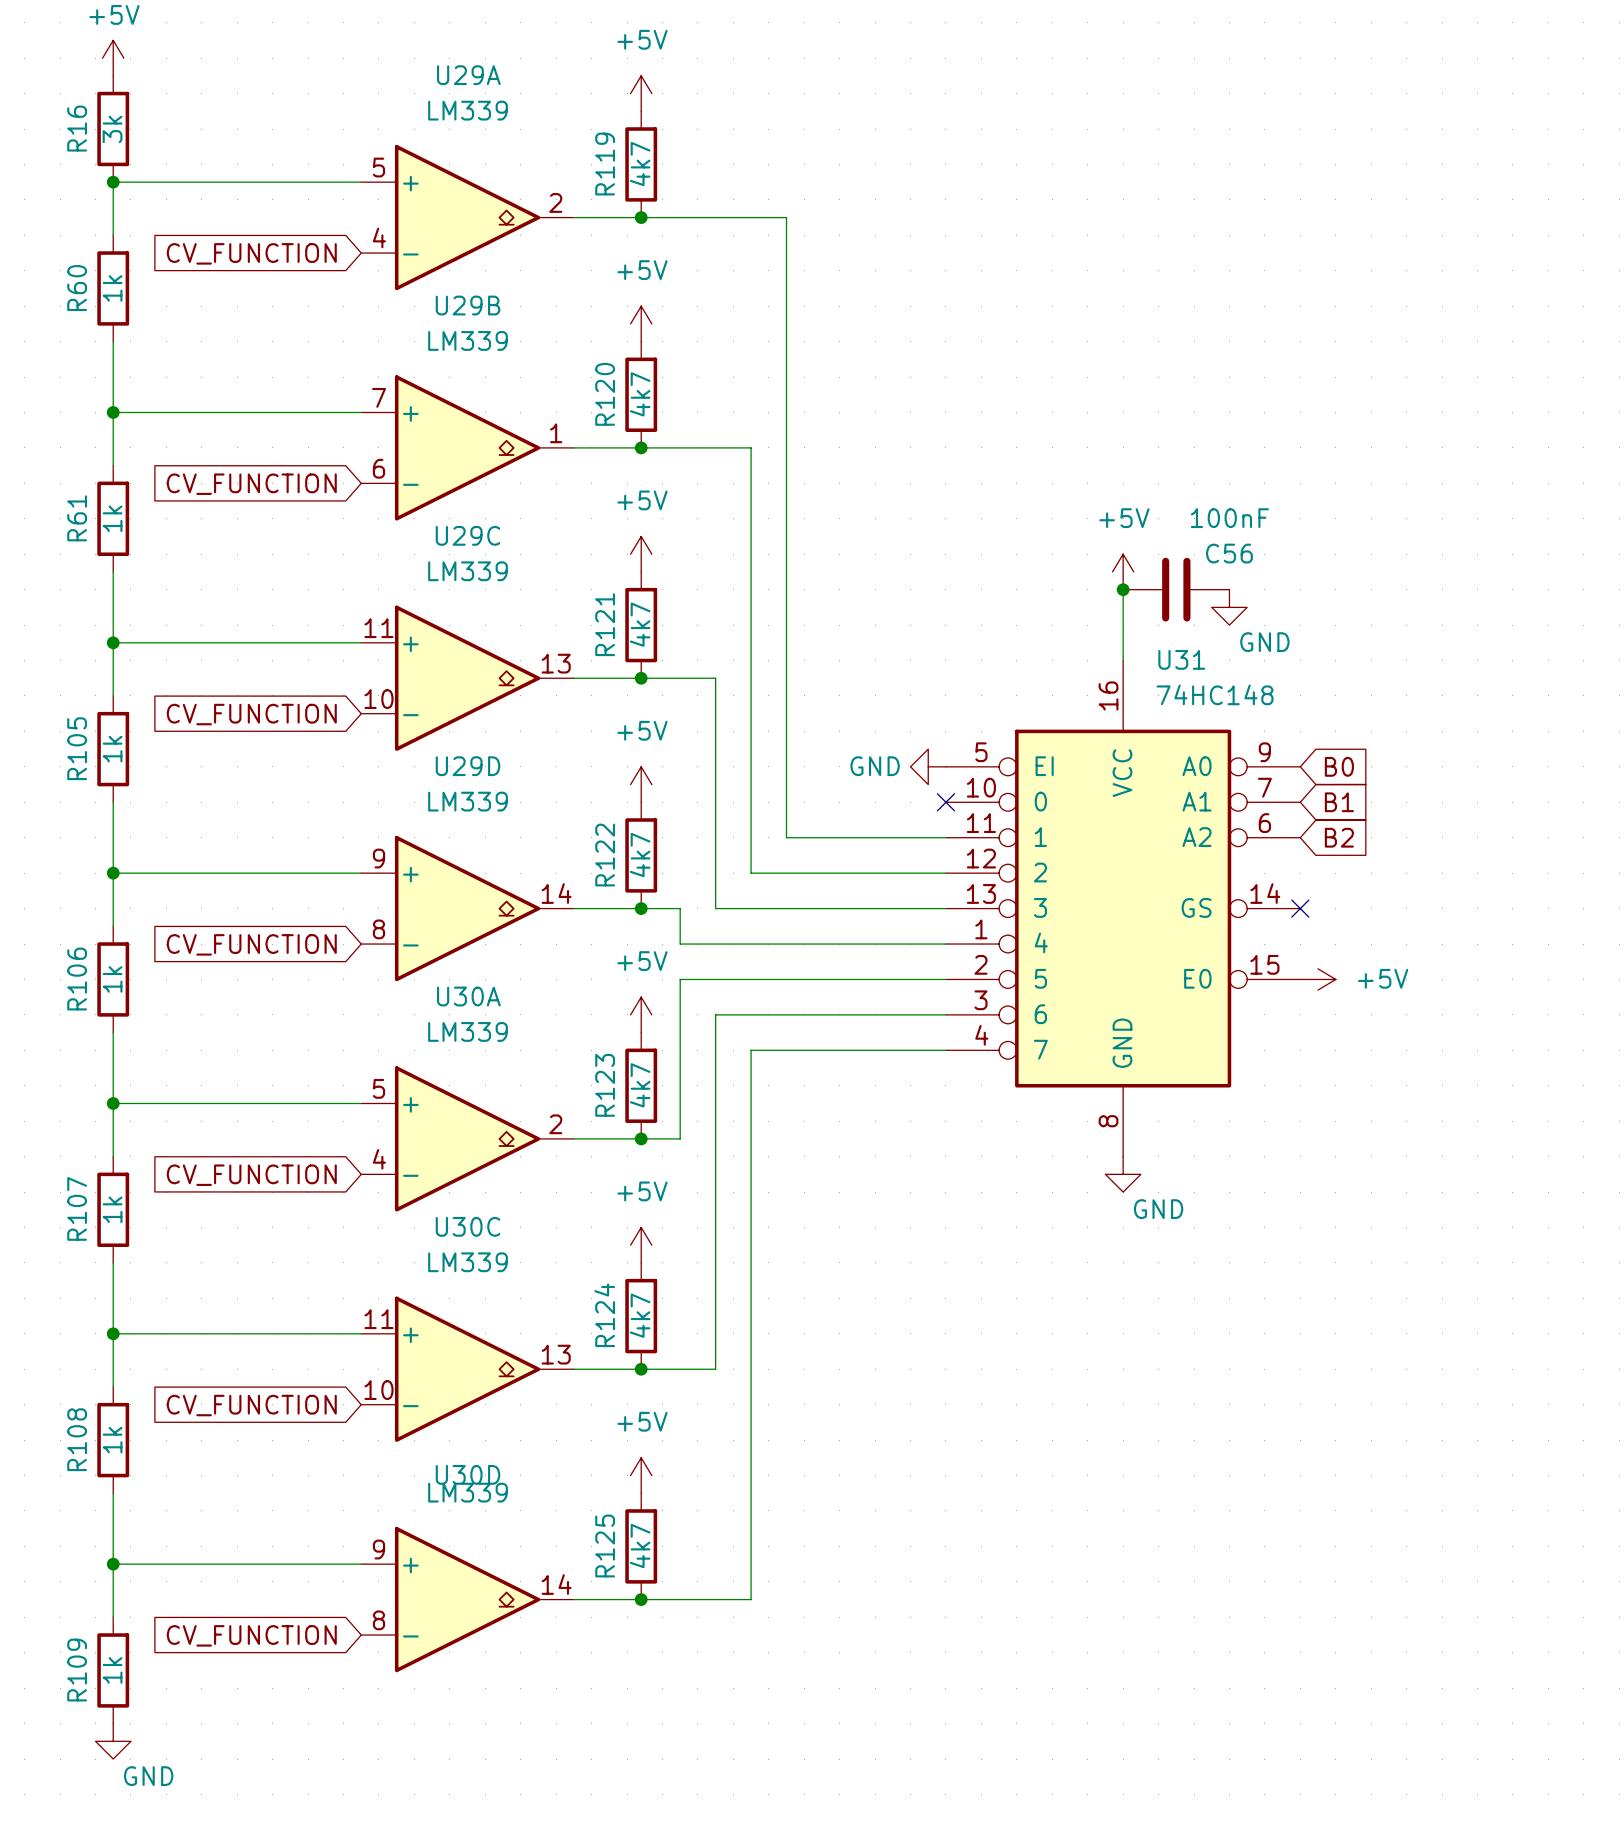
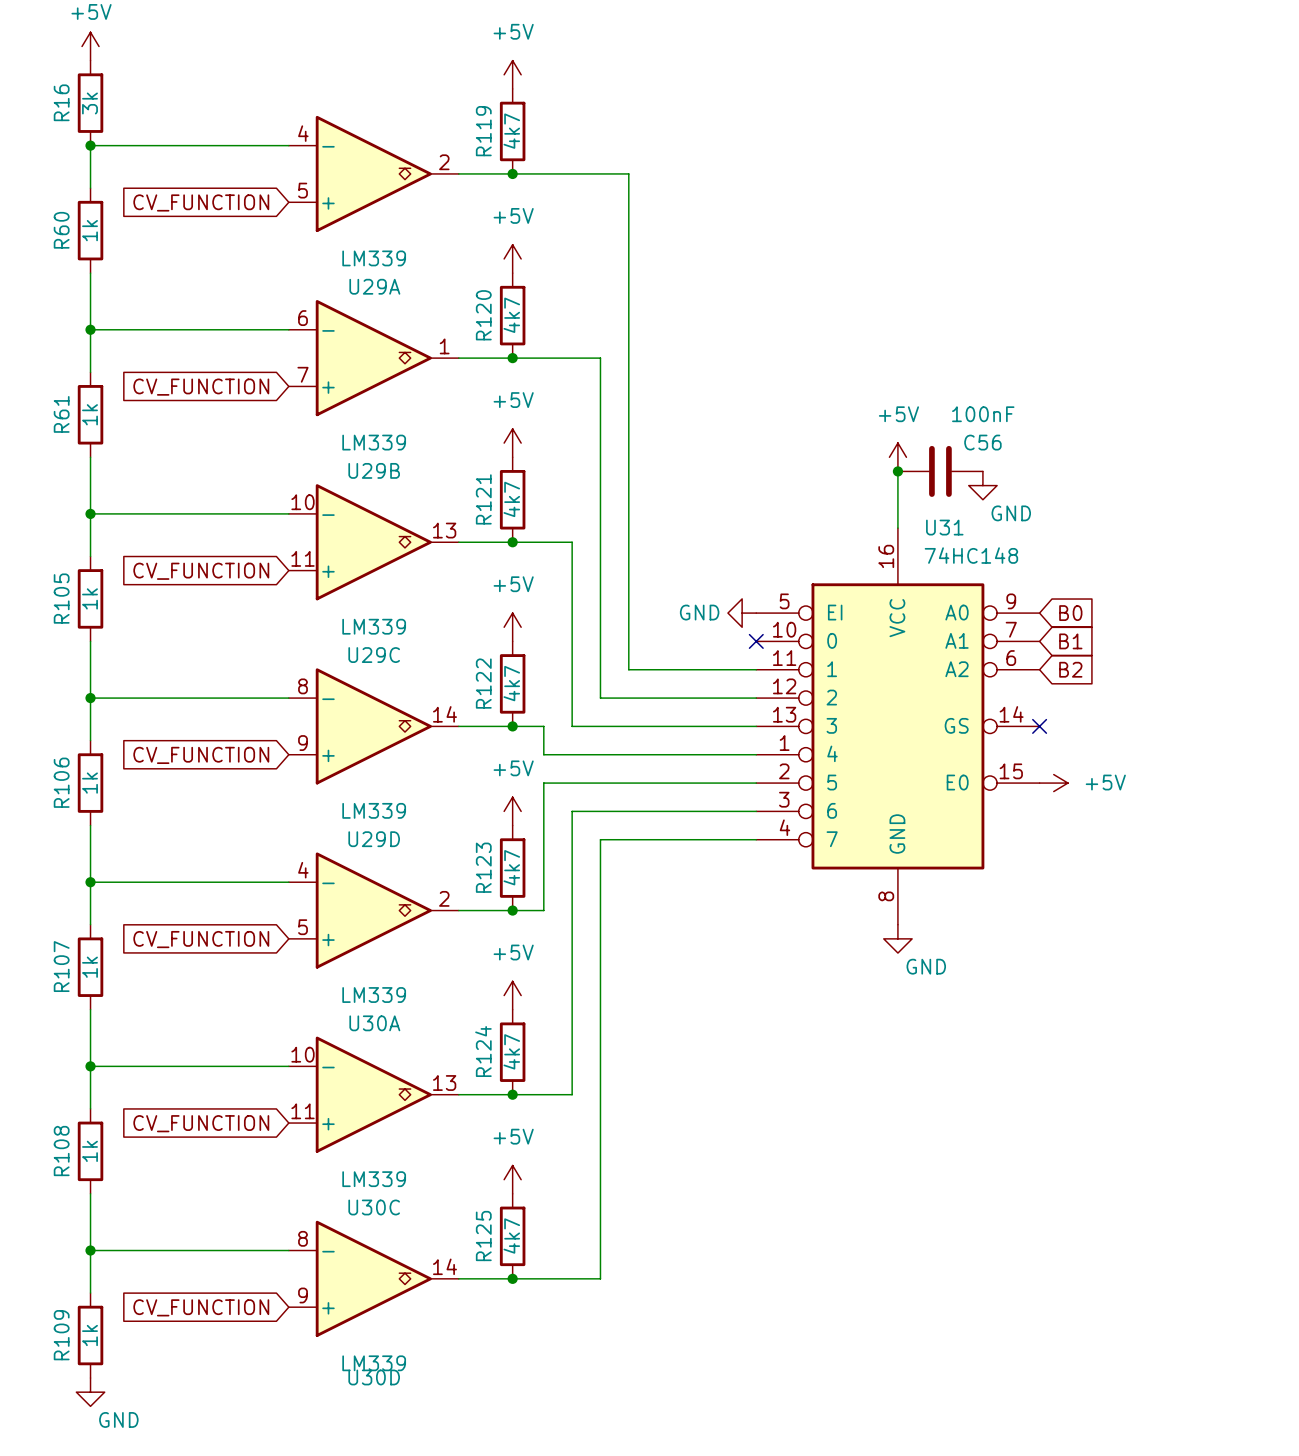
U29A flip: as is (467, 217) -> up-down (373, 173)
U29B flip: as is (467, 447) -> up-down (373, 358)
U29C flip: as is (467, 678) -> up-down (373, 542)
U29D flip: as is (467, 908) -> up-down (373, 726)
U30A flip: as is (467, 1138) -> up-down (373, 910)
U30C flip: as is (467, 1369) -> up-down (373, 1094)
U30D flip: as is (467, 1599) -> up-down (373, 1278)

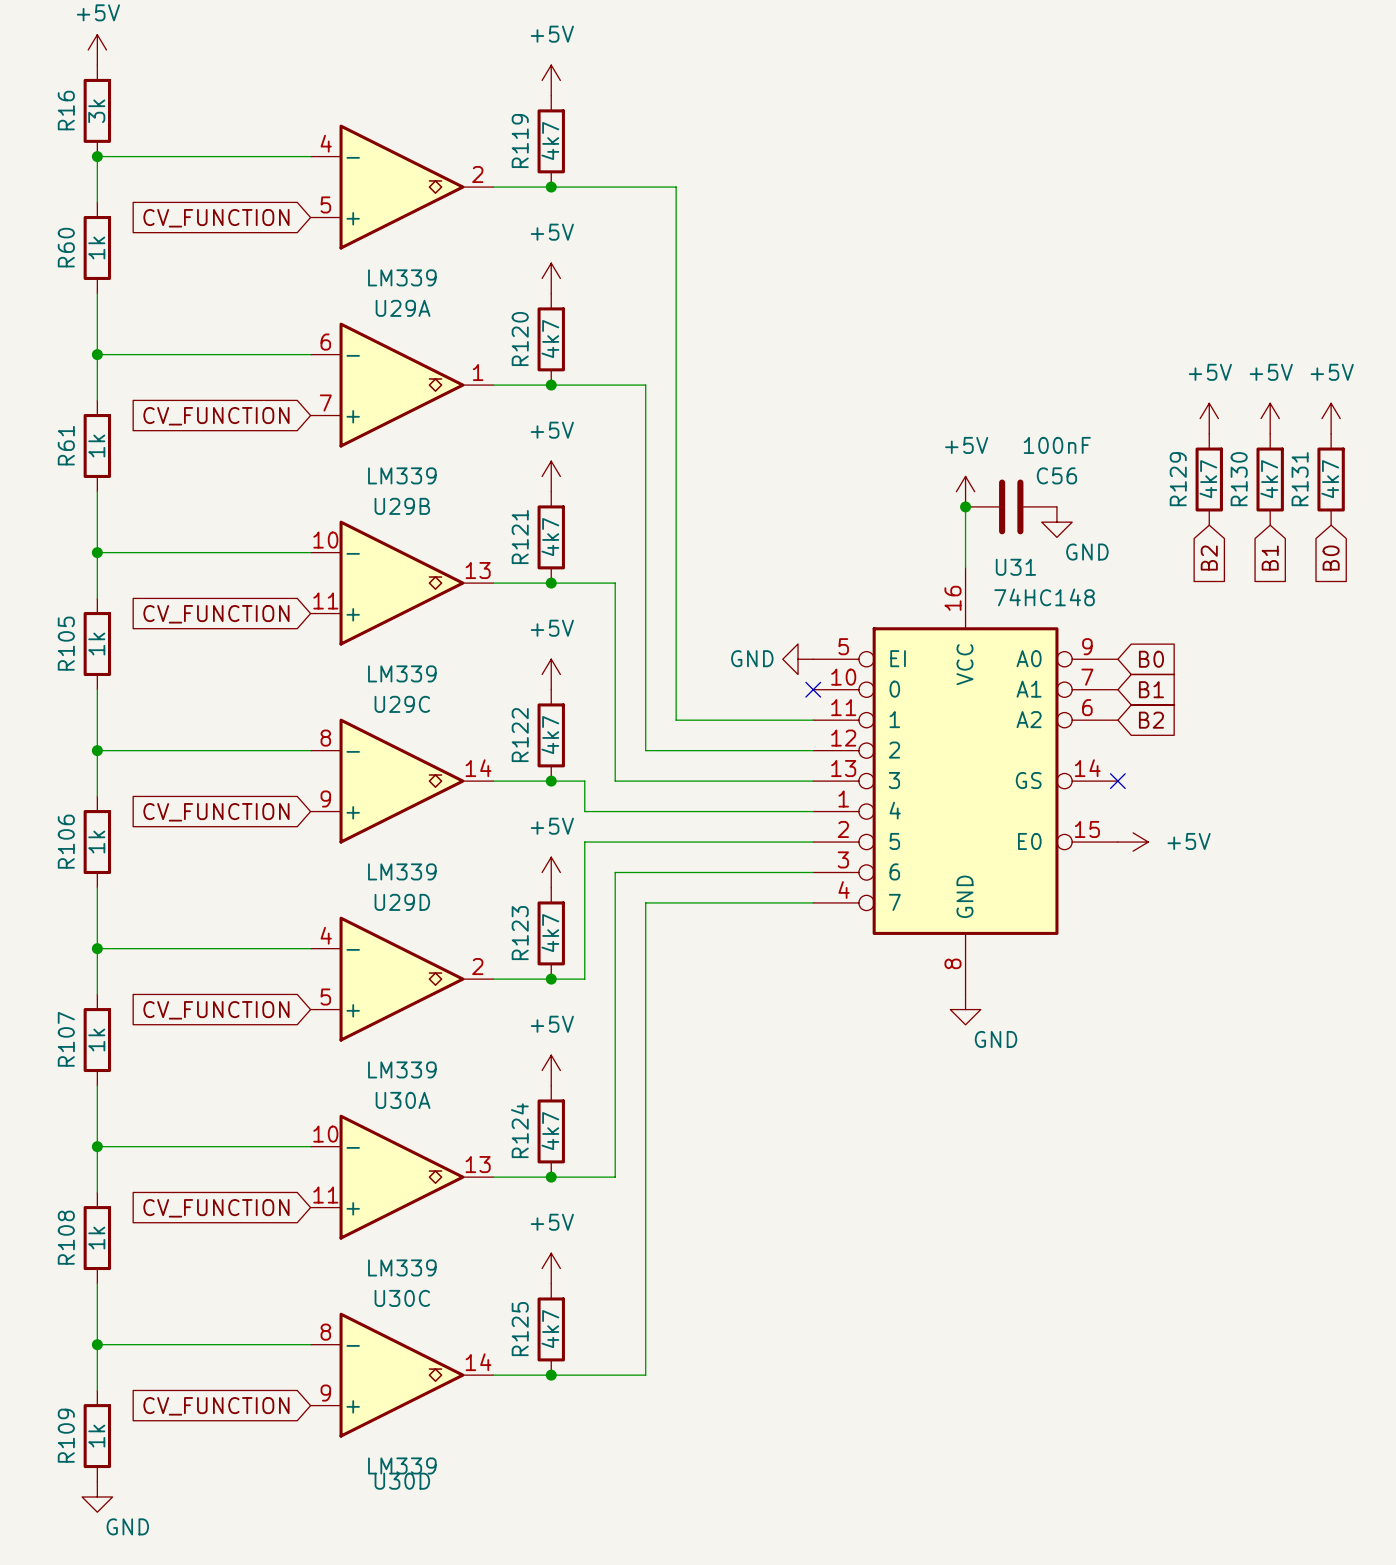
power symbol: none -> +5V (1209, 418)
power symbol: none -> +5V (1270, 418)
power symbol: none -> +5V (1331, 418)
R129: none -> 4k7 (1209, 479)
R130: none -> 4k7 (1270, 479)
R131: none -> 4k7 (1331, 479)
global label: none -> B2 (1209, 558)
global label: none -> B1 (1270, 558)
global label: none -> B0 (1331, 558)

